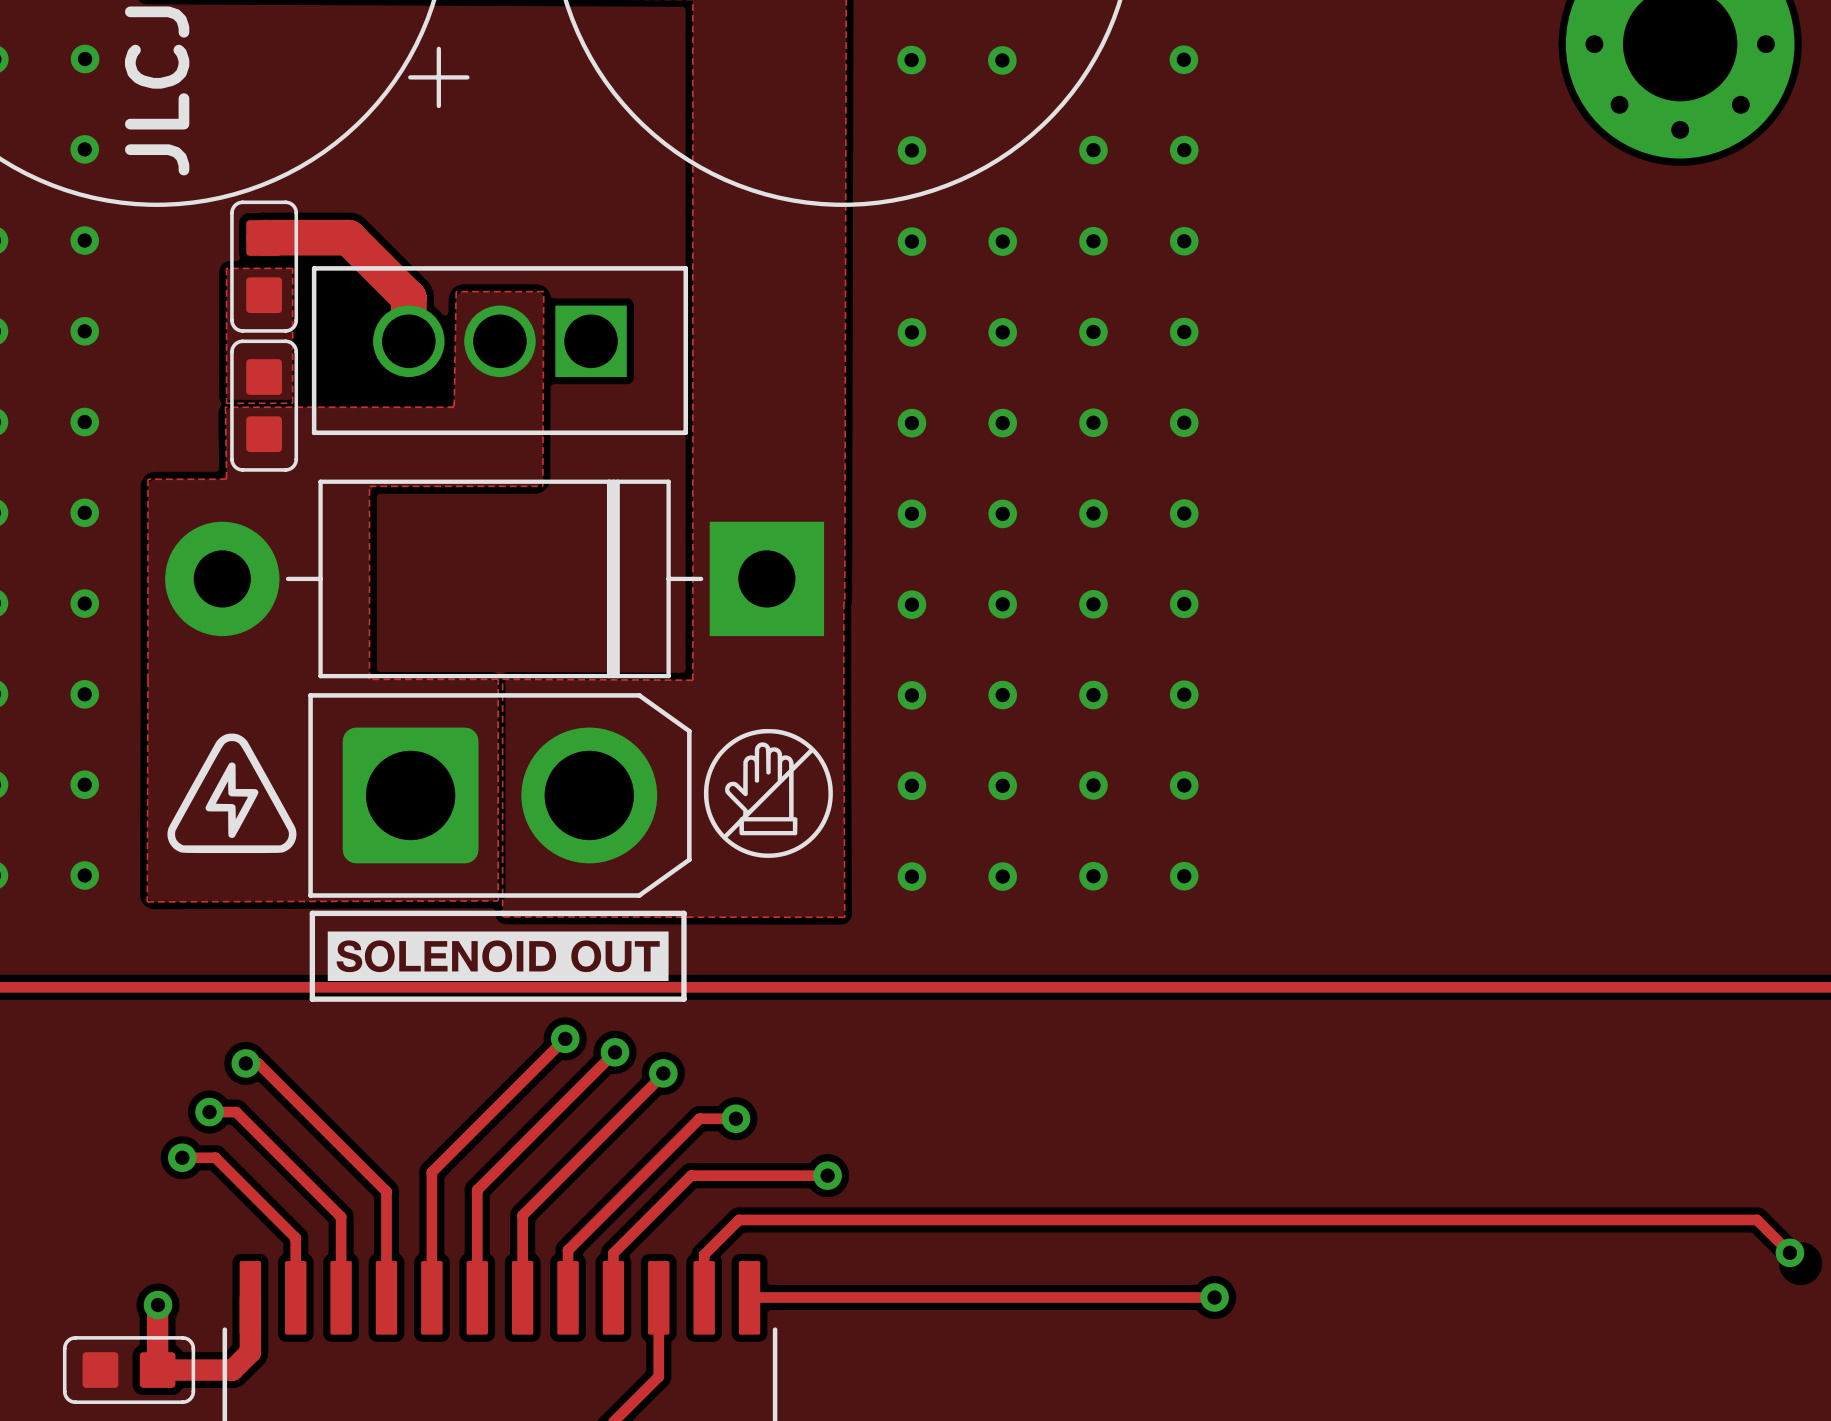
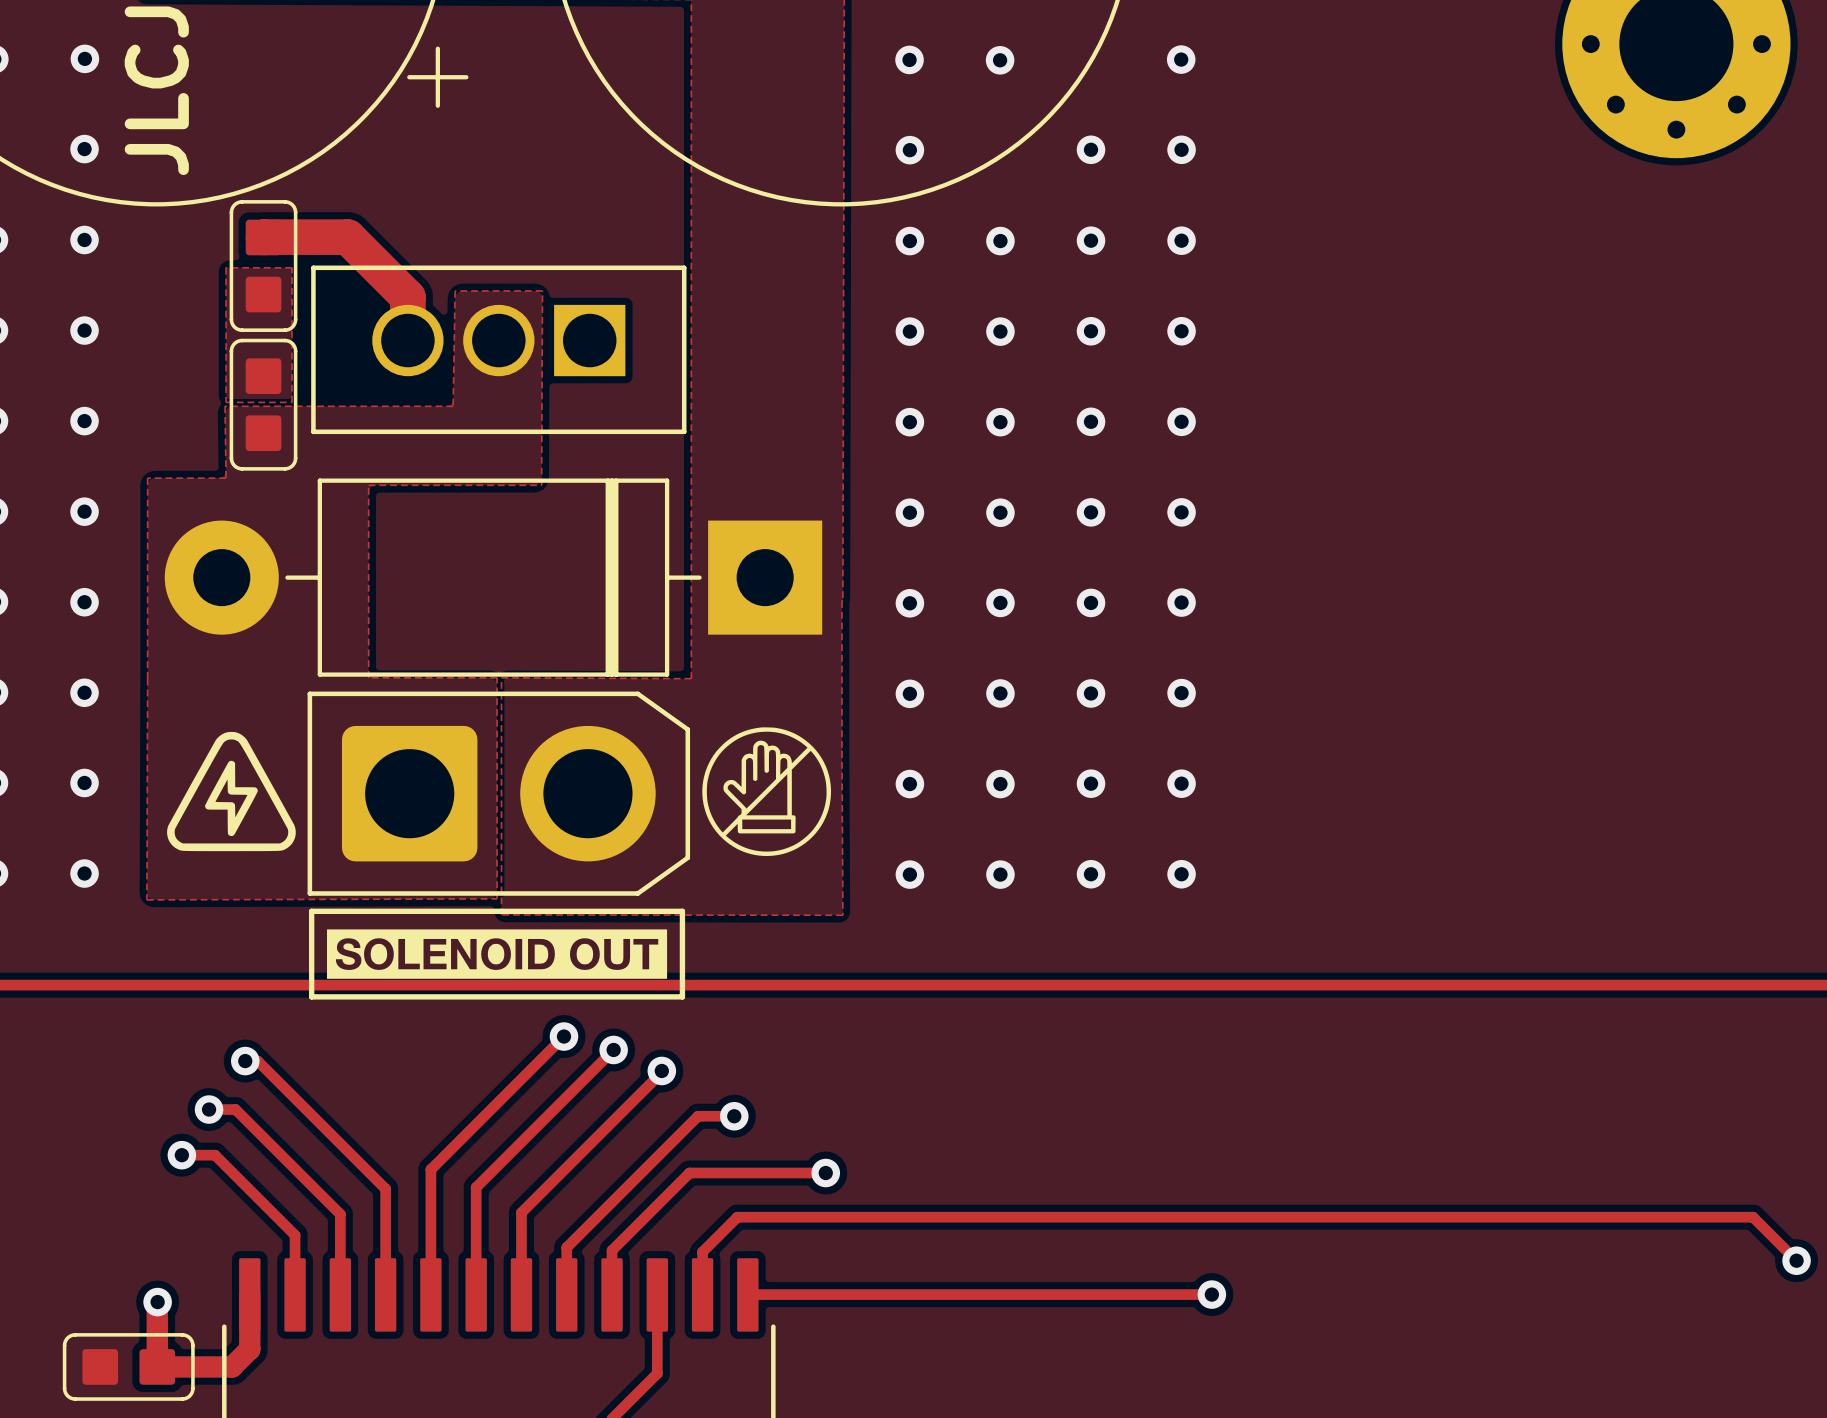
via position: (1789, 1252) -> (1796, 1260)

